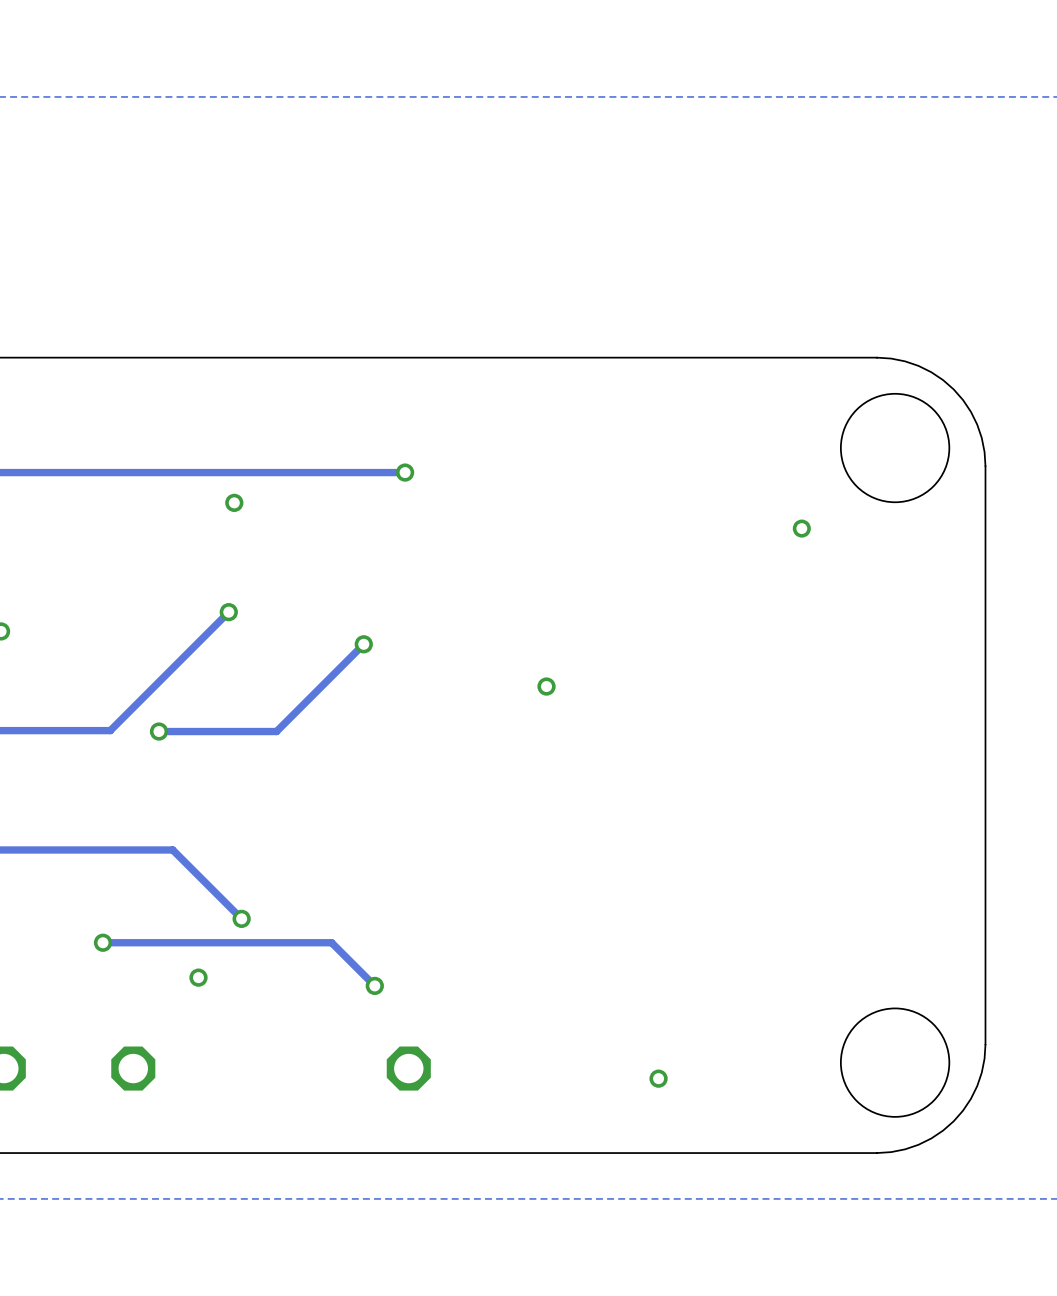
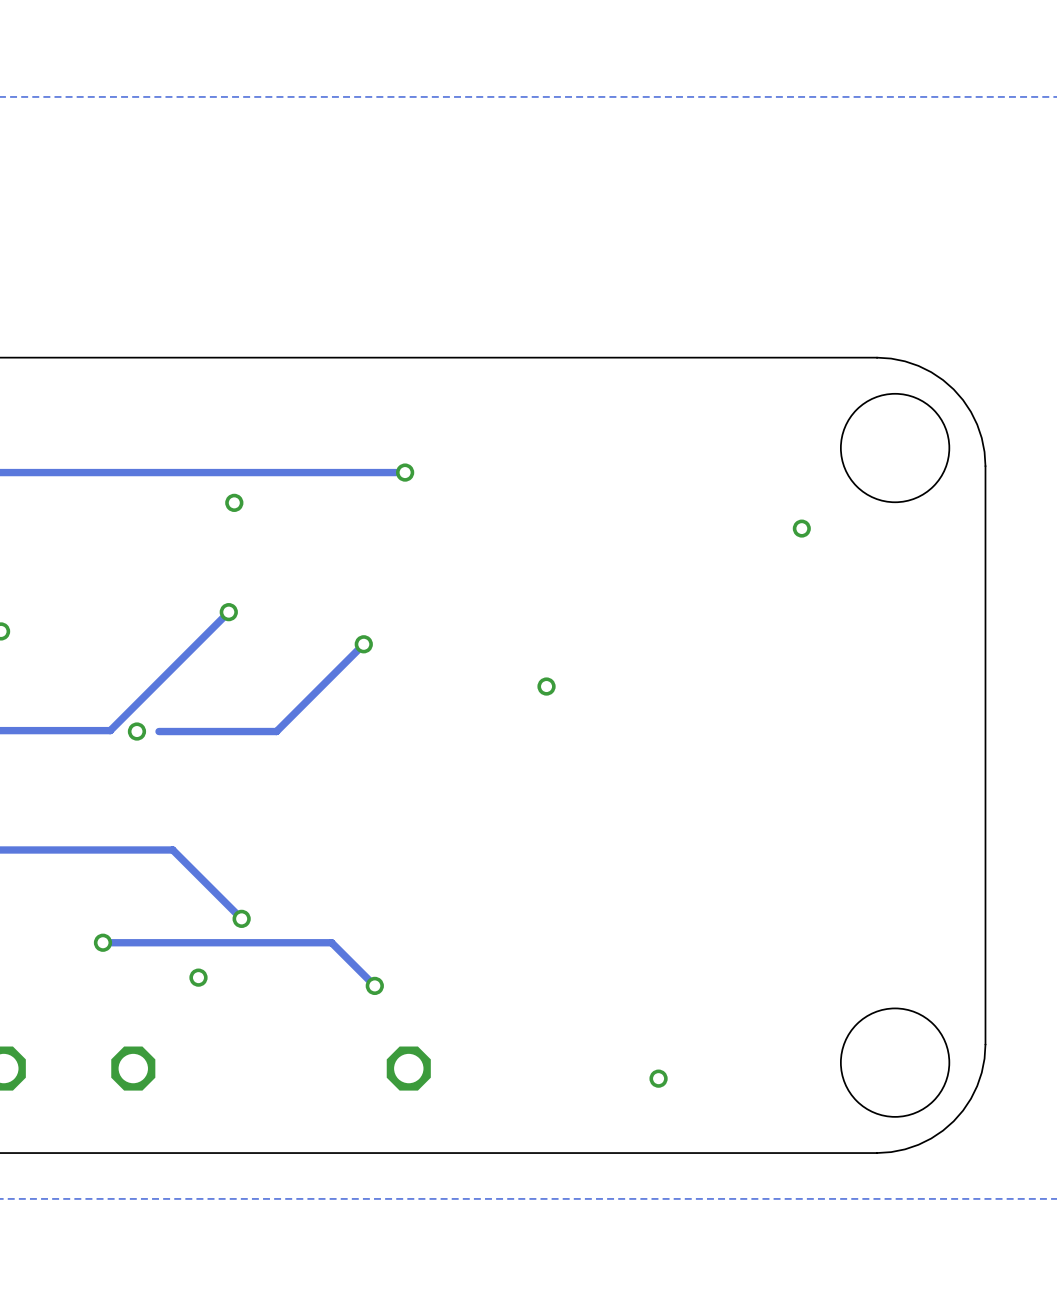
via position: (159, 731) -> (136, 731)

